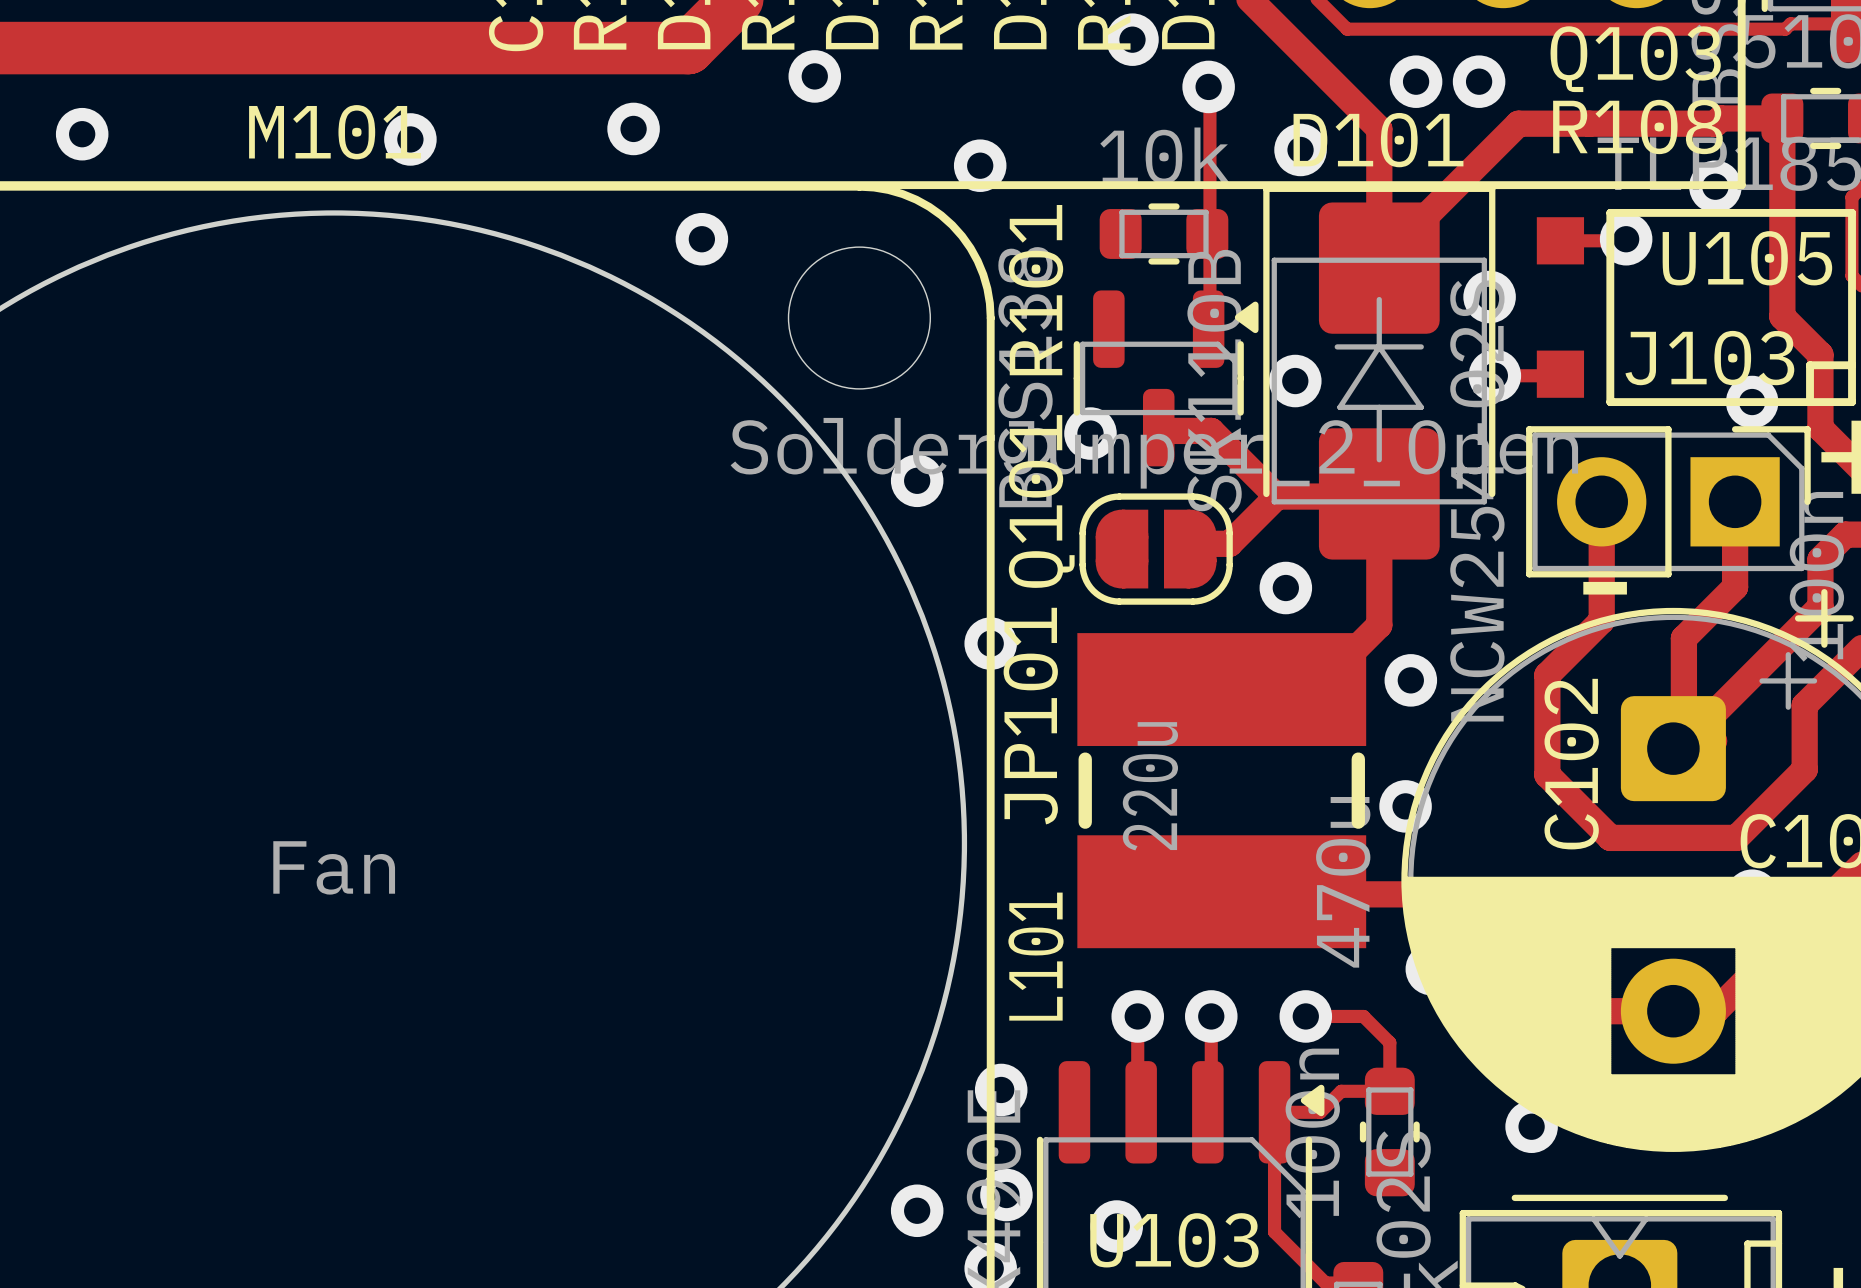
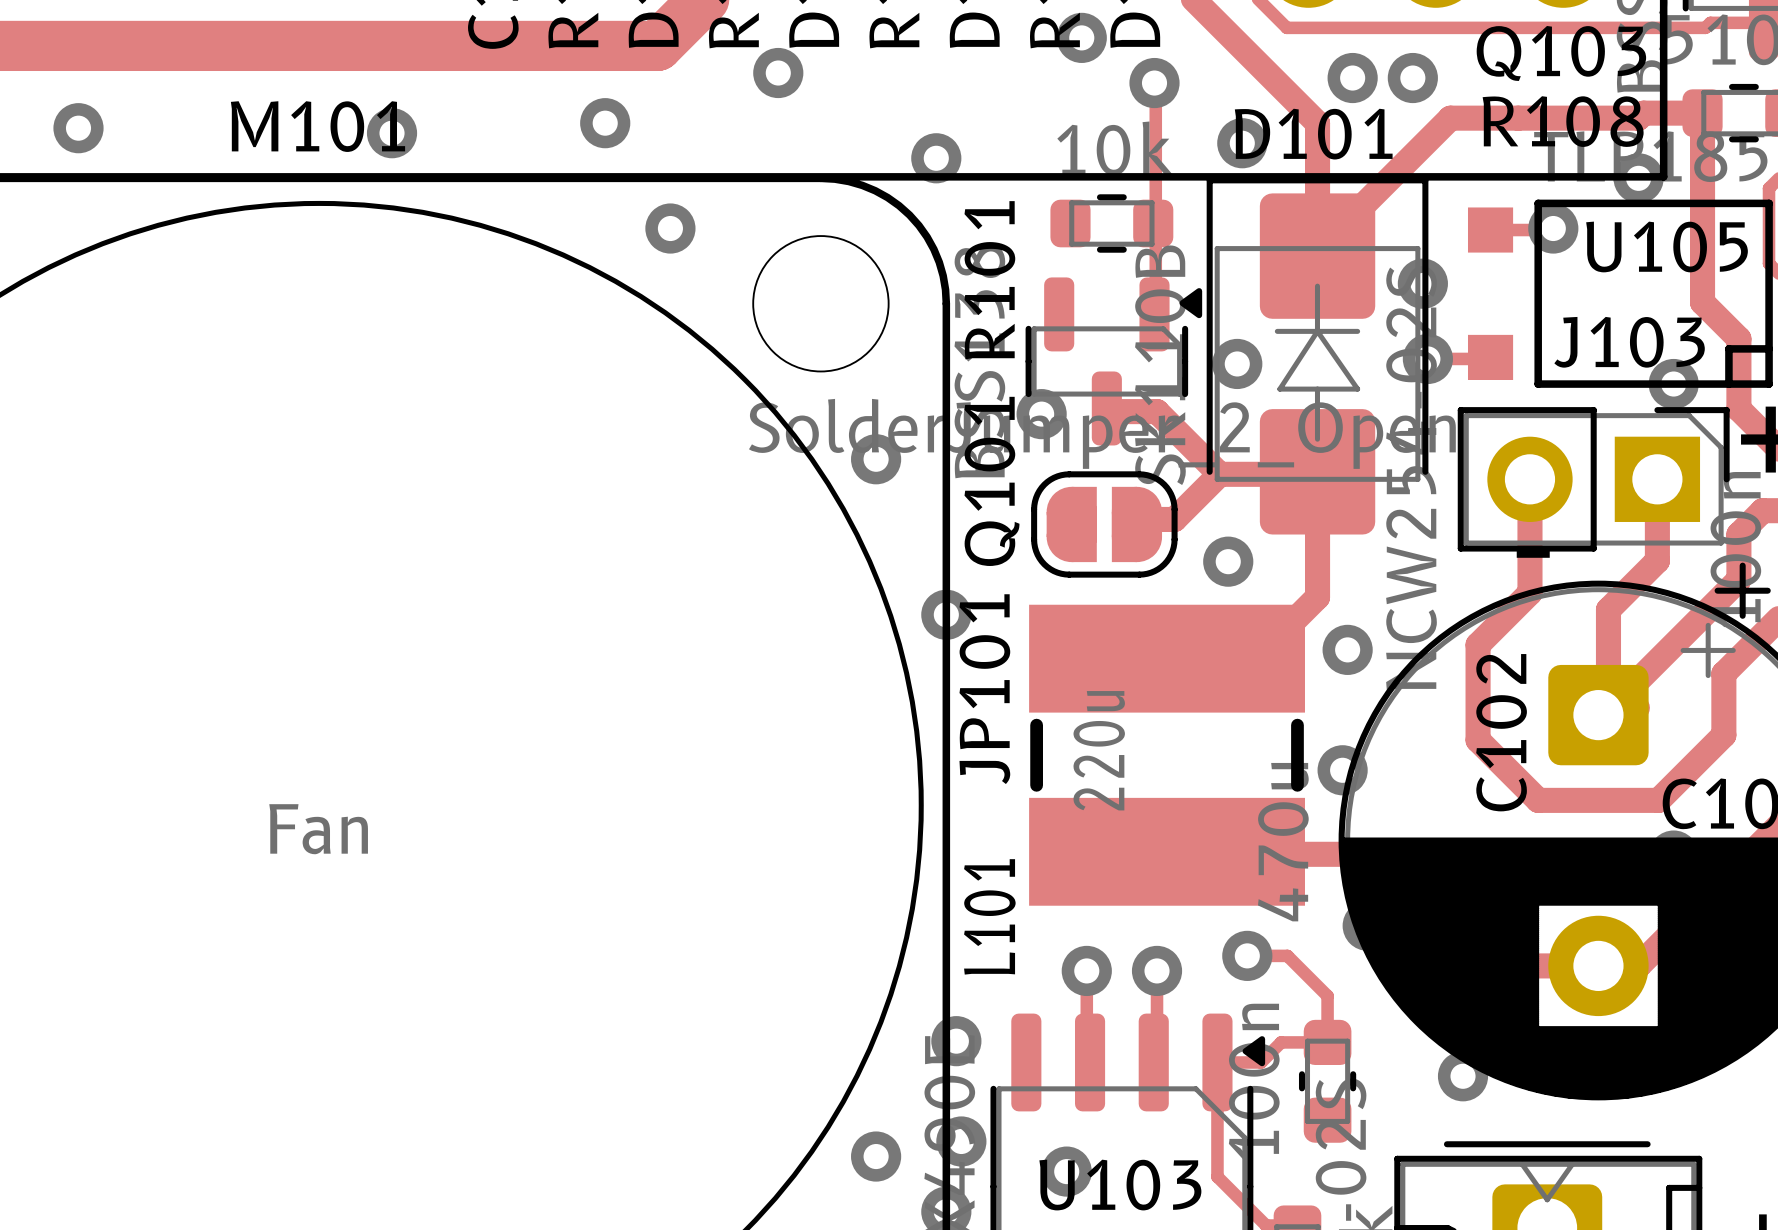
track: (1305, 1016) (1363, 1016) -> (1247, 955) (1287, 955) (1302, 970)
via position: (1305, 1016) -> (1247, 955)

